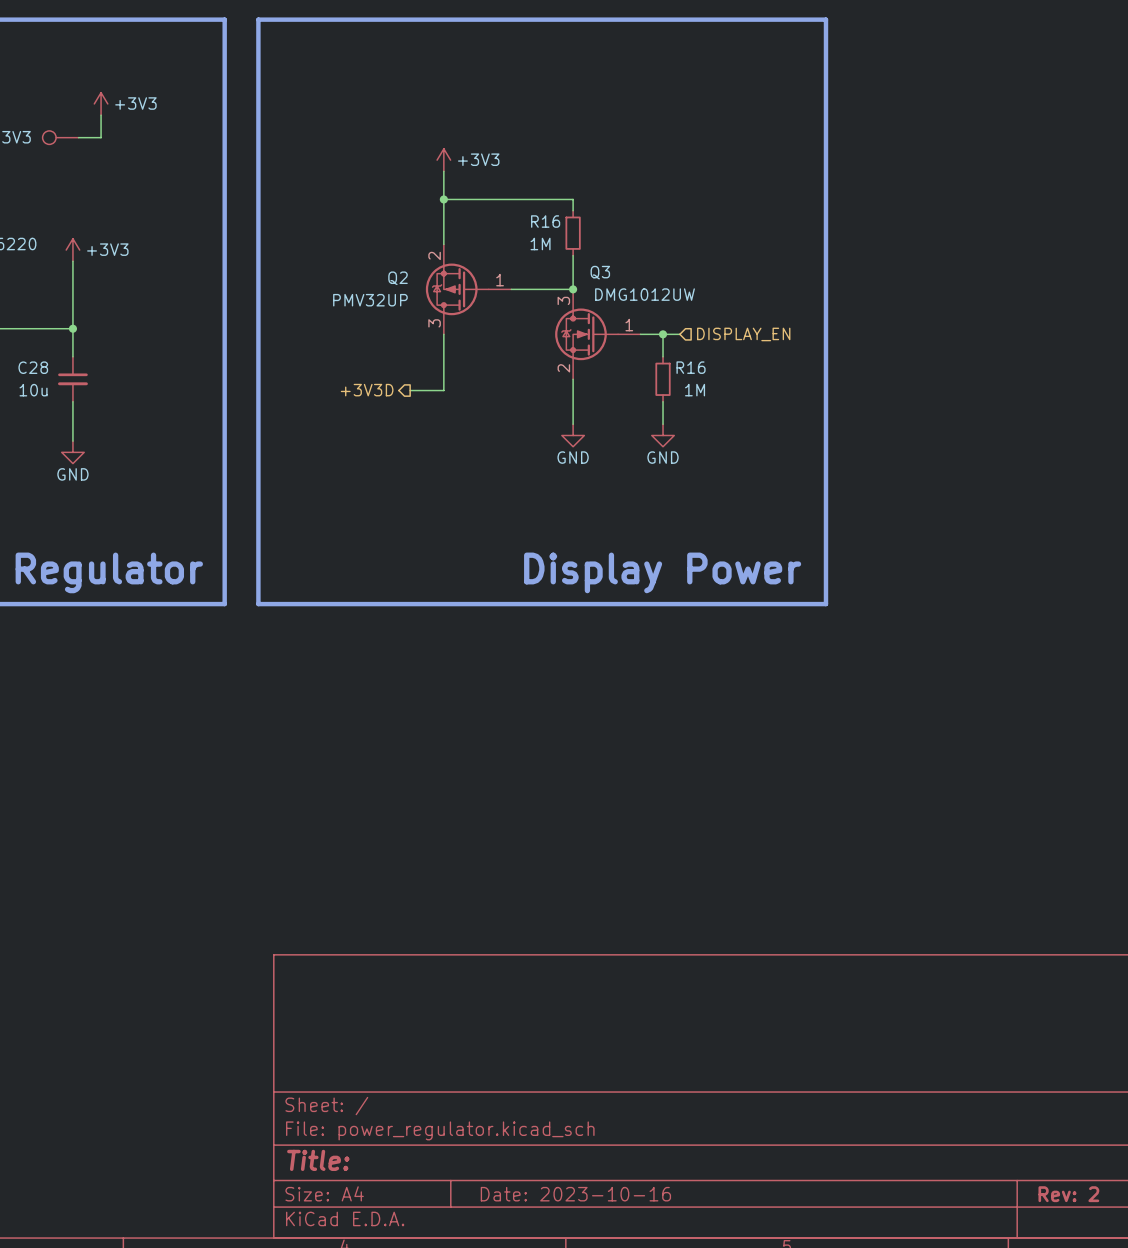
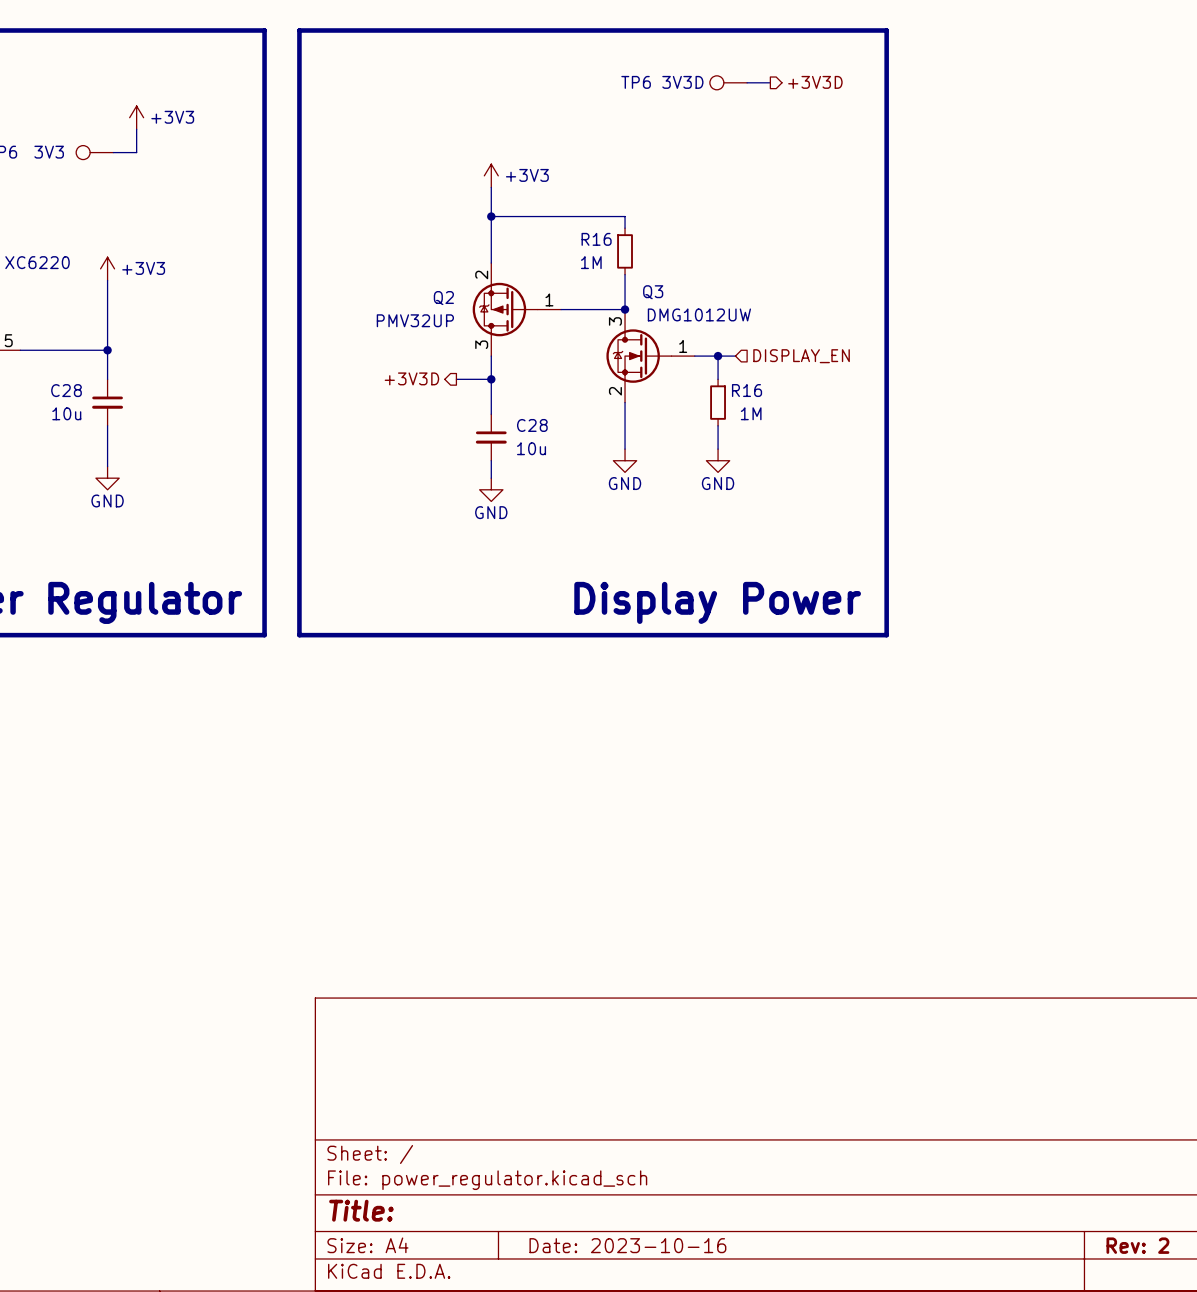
hierarchical label: none -> +3V3D (815, 82)
TP6: none -> 3V3D (728, 82)
wire: none -> (747, 82) (770, 82)
junction: none -> (491, 379)
hierarchical label position: +3V3D (367, 390) -> +3V3D (411, 378)
wire: (410, 390) (443, 390) -> (456, 379) (491, 379)
C28: none -> 10u (491, 437)
wire: none -> (491, 460) (491, 478)
power symbol: none -> GND (491, 489)

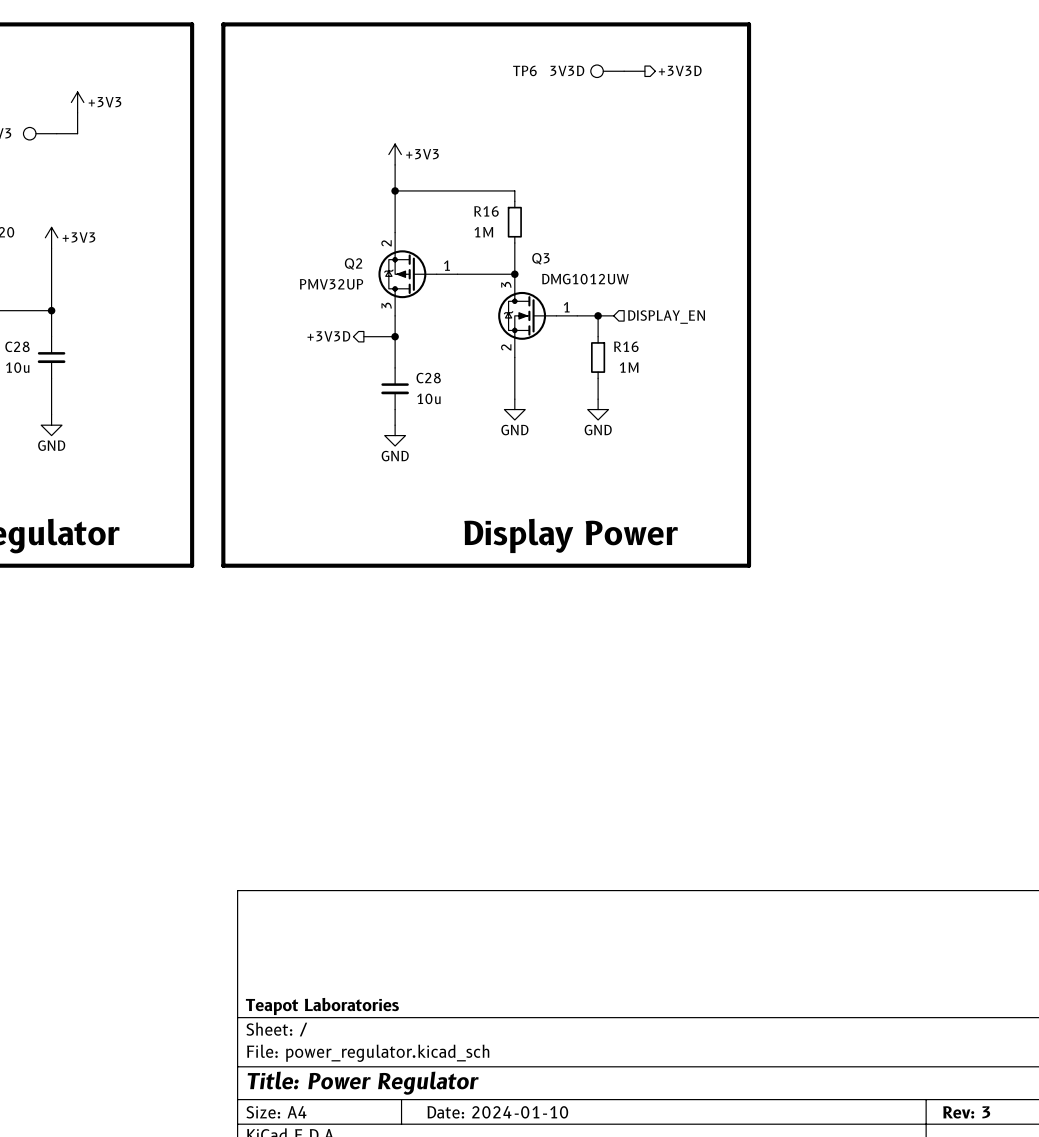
title block: none -> Teapot Laboratories (322, 1006)
title block: Title: (361, 1210) -> Title: Power Regulator (363, 1083)
title block: Date: 2023-10-16 (627, 1245) -> Date: 2024-01-10 (497, 1112)
title block: Rev: 2 (1137, 1245) -> Rev: 3 (966, 1112)

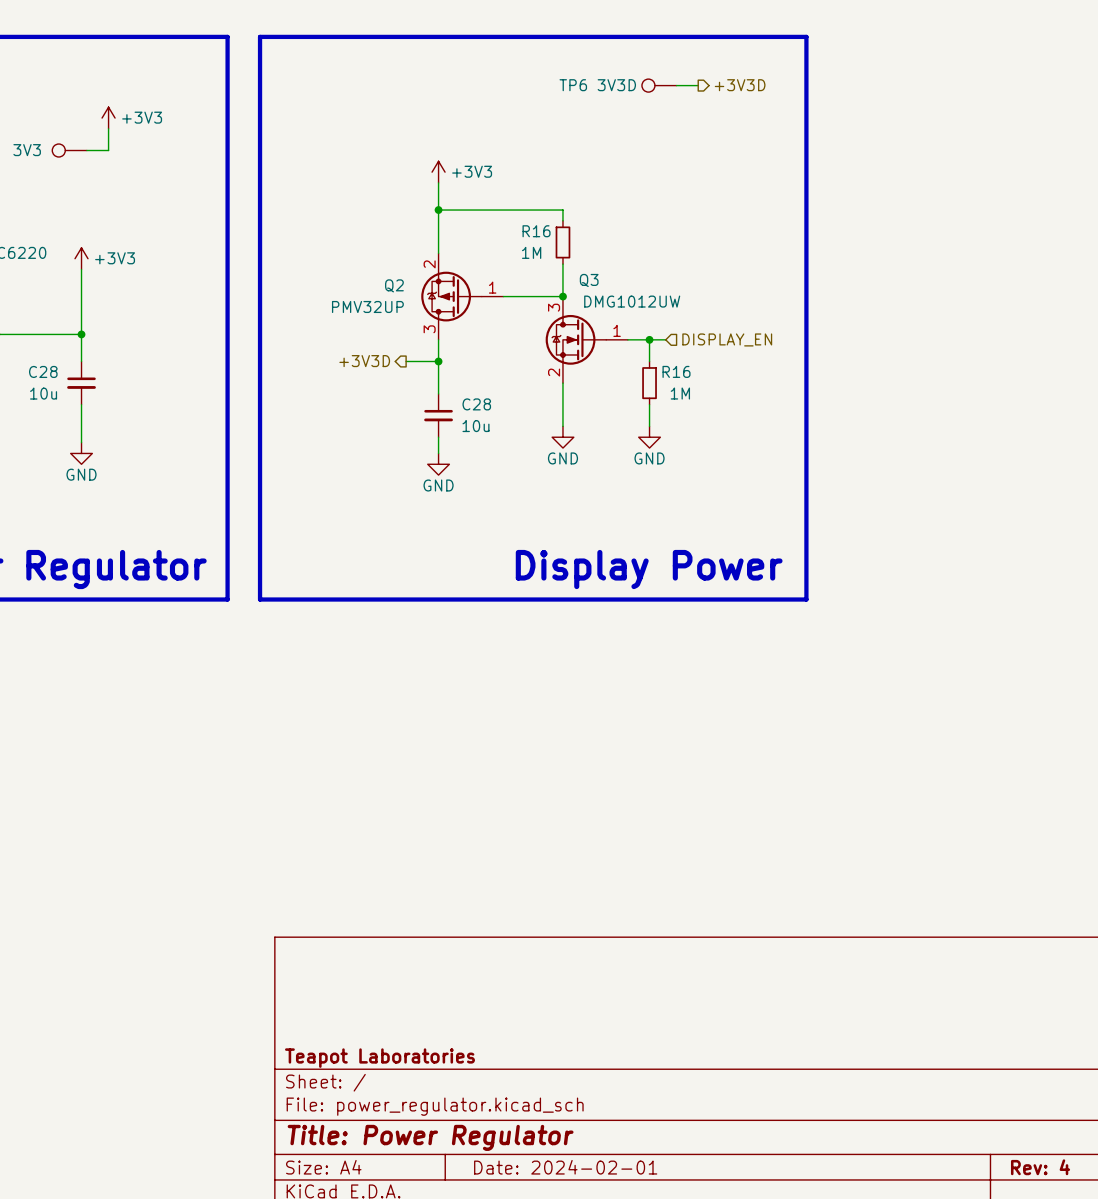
title block: Date: 2024-01-10 (497, 1112) -> Date: 2024-02-01 (565, 1167)
title block: Rev: 3 (966, 1112) -> Rev: 4 (1040, 1167)

